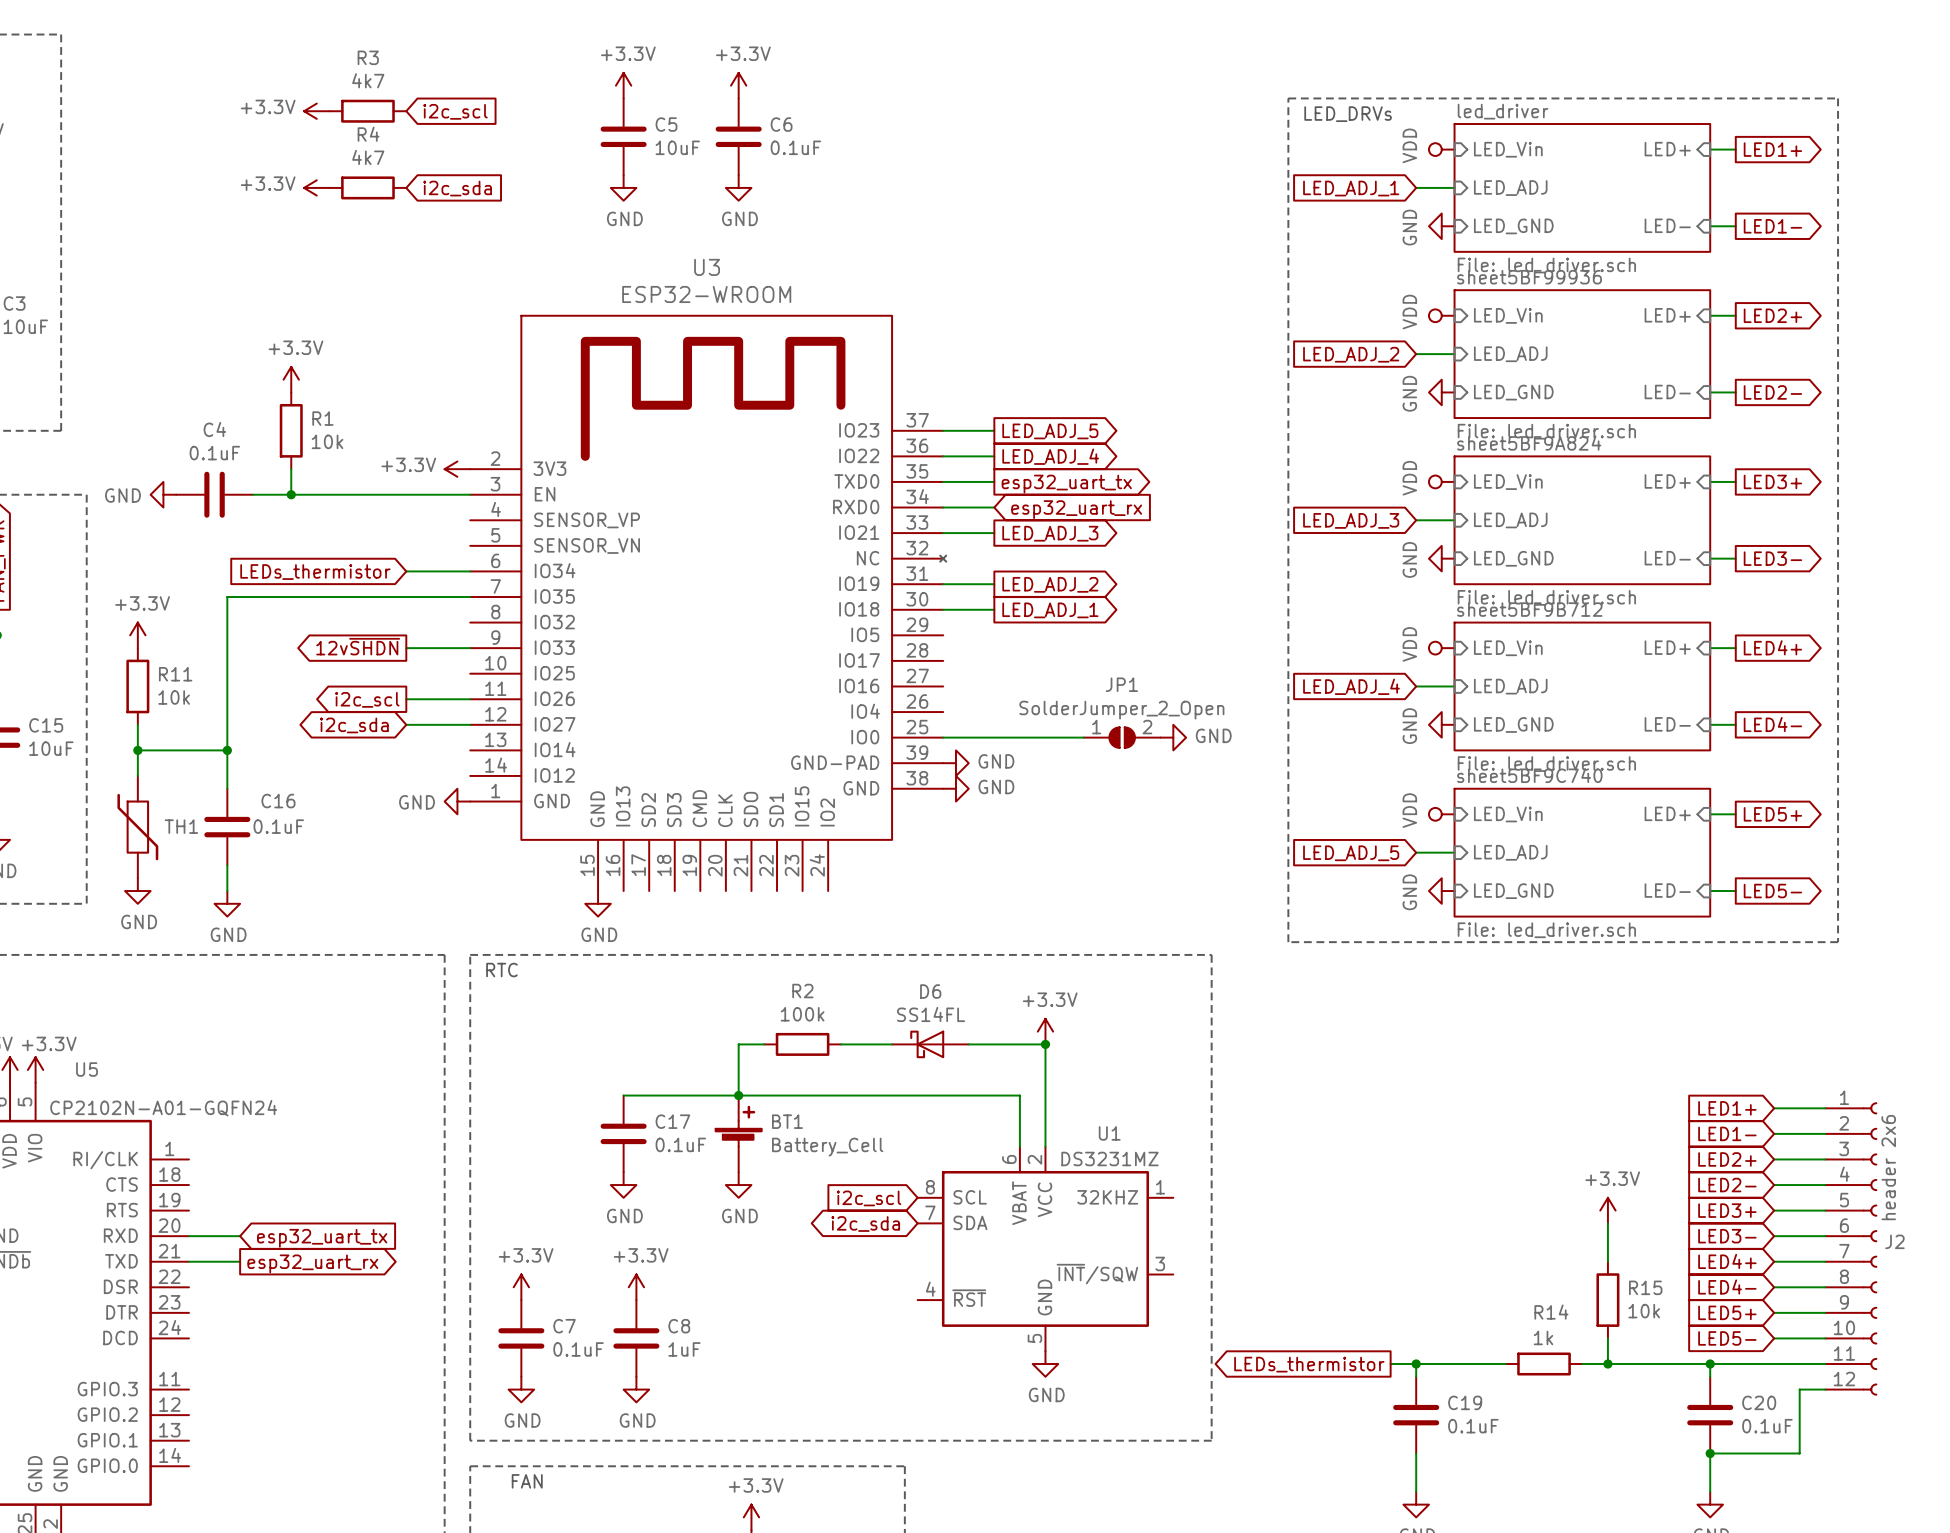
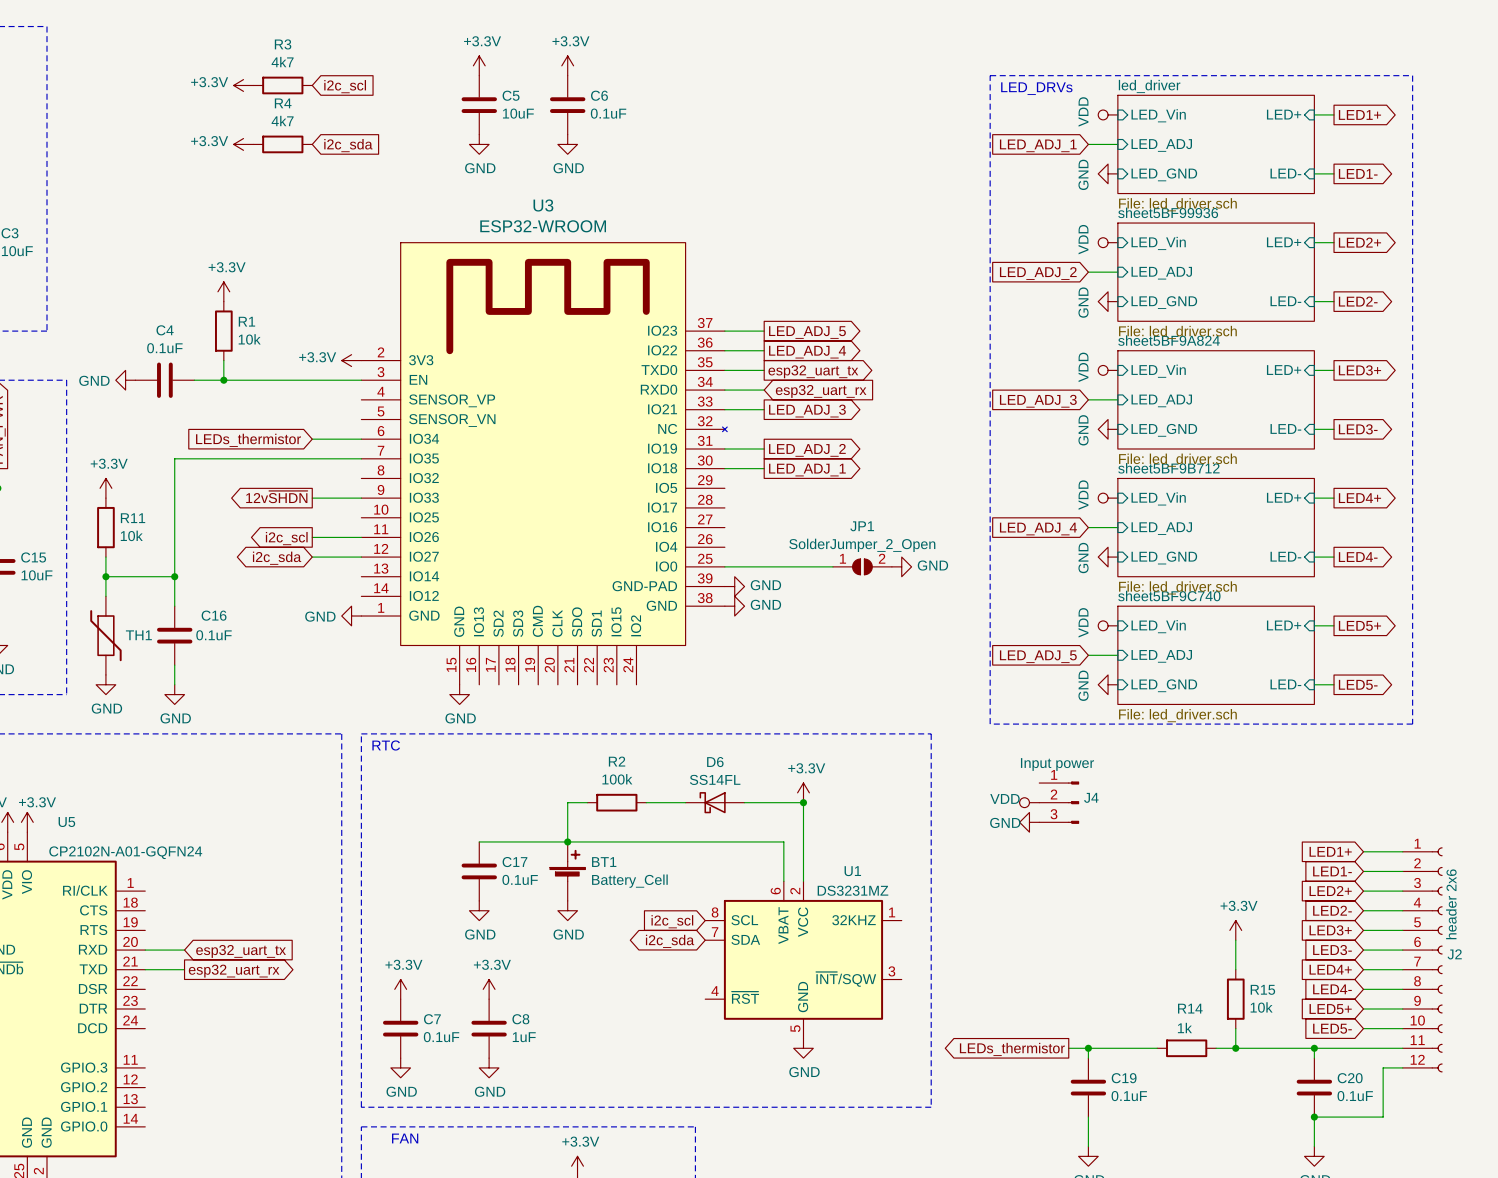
power symbol: none -> VDD (1029, 802)
J4: none -> Input power (1059, 802)
power symbol: none -> GND (1029, 822)

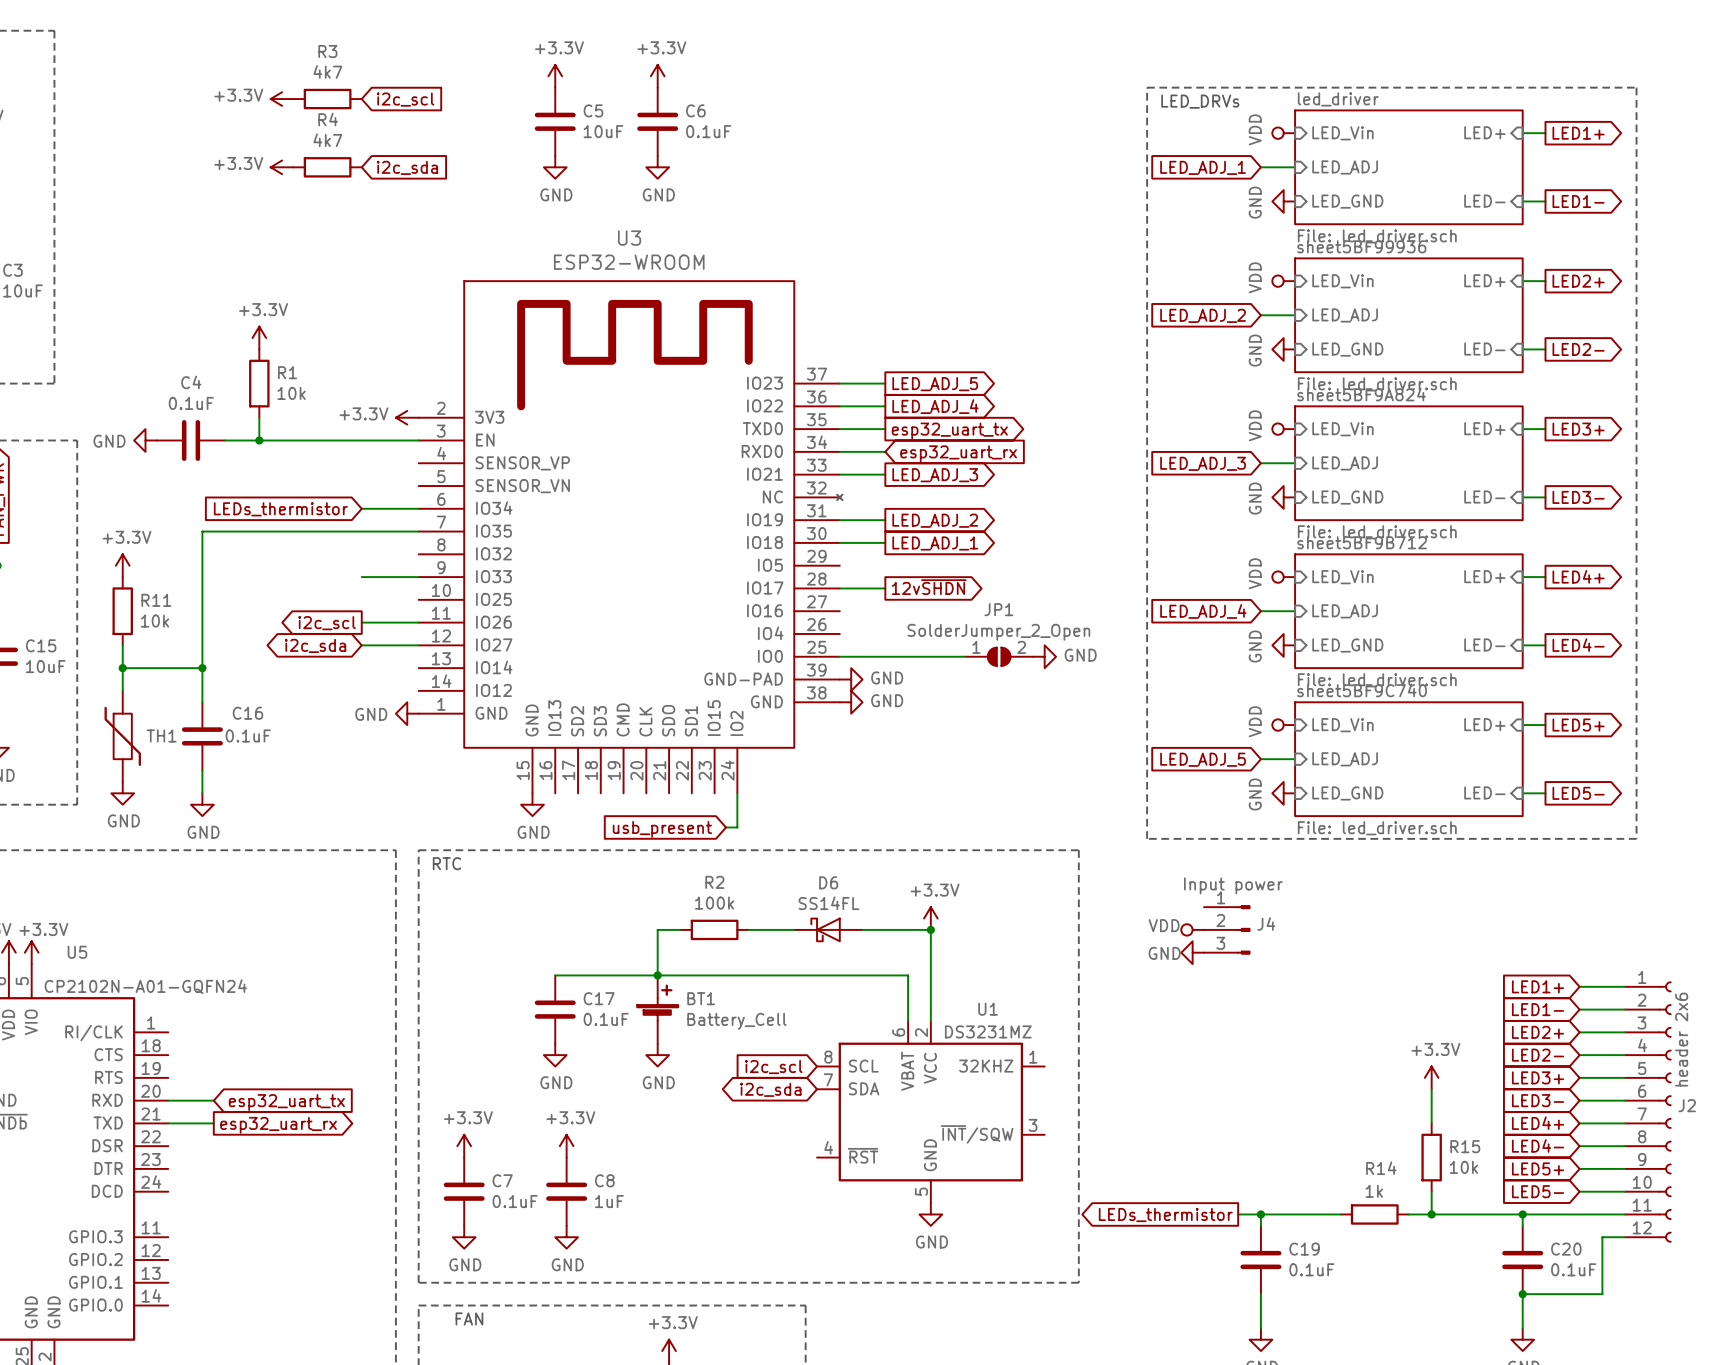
global label: 12v~{SHDN} (276, 497) -> none
global label: none -> 12v~{SHDN} (929, 587)
wire: none -> (839, 588) (885, 588)
wire: none -> (737, 793) (737, 827) (725, 827)
global label: none -> usb_present (662, 829)

